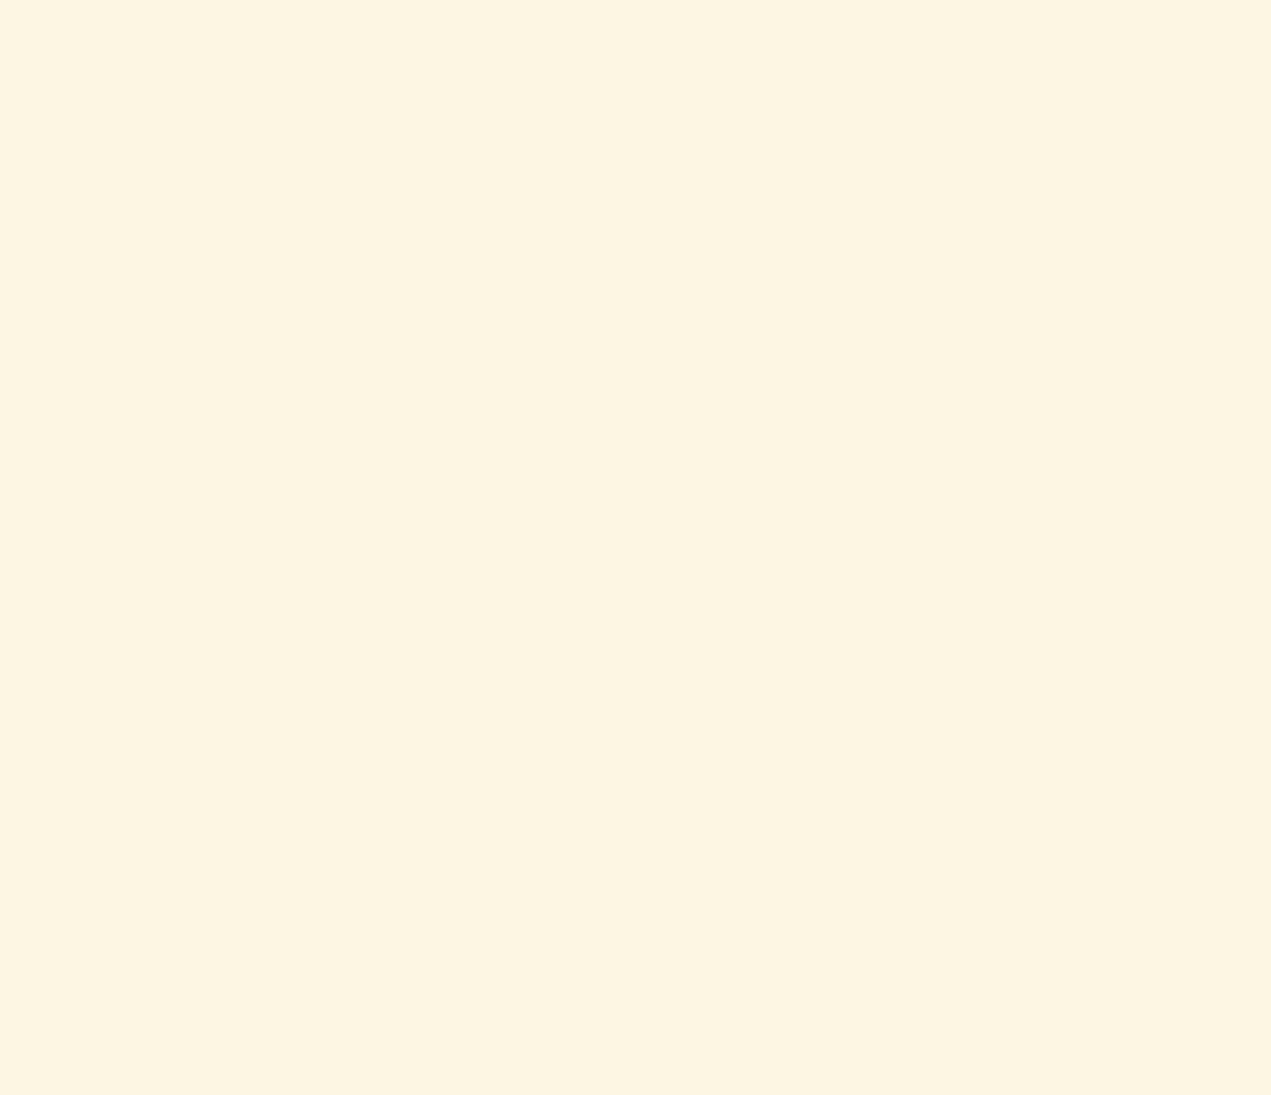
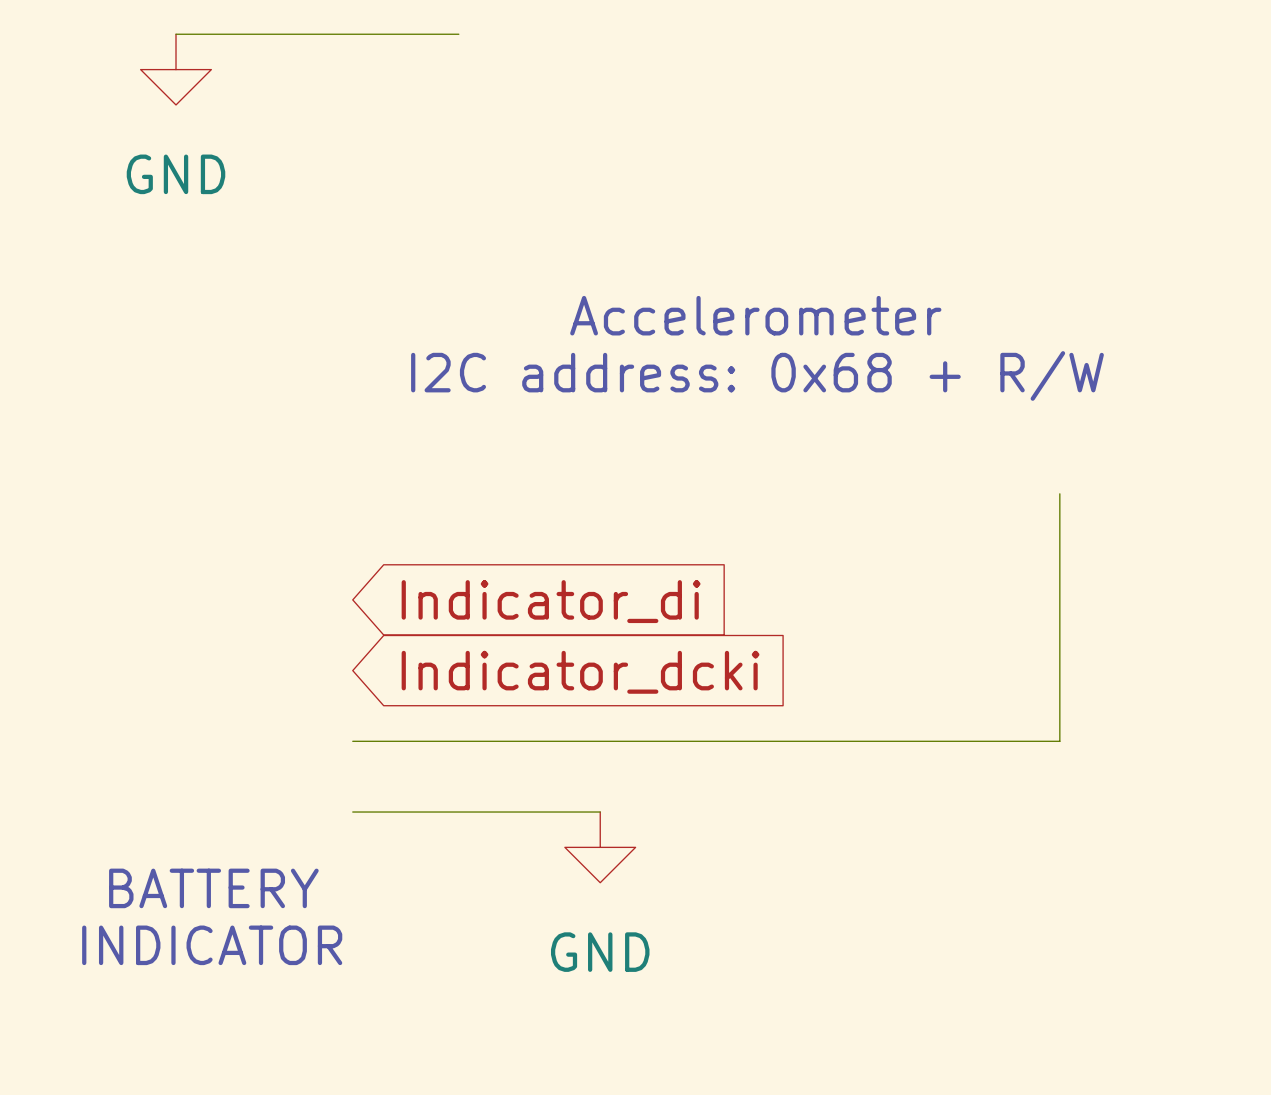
wire: none -> (176, 34) (458, 34)
power symbol: none -> GND (176, 69)
text: none -> Accelerometer (755, 315)
text: none -> I2C address: 0x68 + R/W (757, 375)
wire: none -> (1059, 493) (1059, 741) (352, 741)
global label: none -> Indicator_di (551, 601)
global label: none -> Indicator_dcki (580, 672)
wire: none -> (352, 812) (600, 812)
power symbol: none -> GND (600, 847)
text: none -> BATTERY (213, 888)
text: none -> INDICATOR (212, 945)

